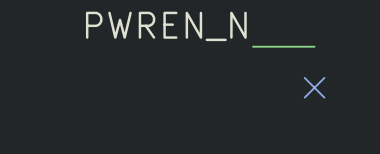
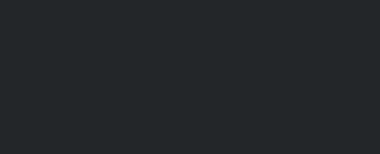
label: PWREN_N (166, 26) -> none
wire: (252, 46) (314, 46) -> none
no-connect mark: (314, 87) -> none

